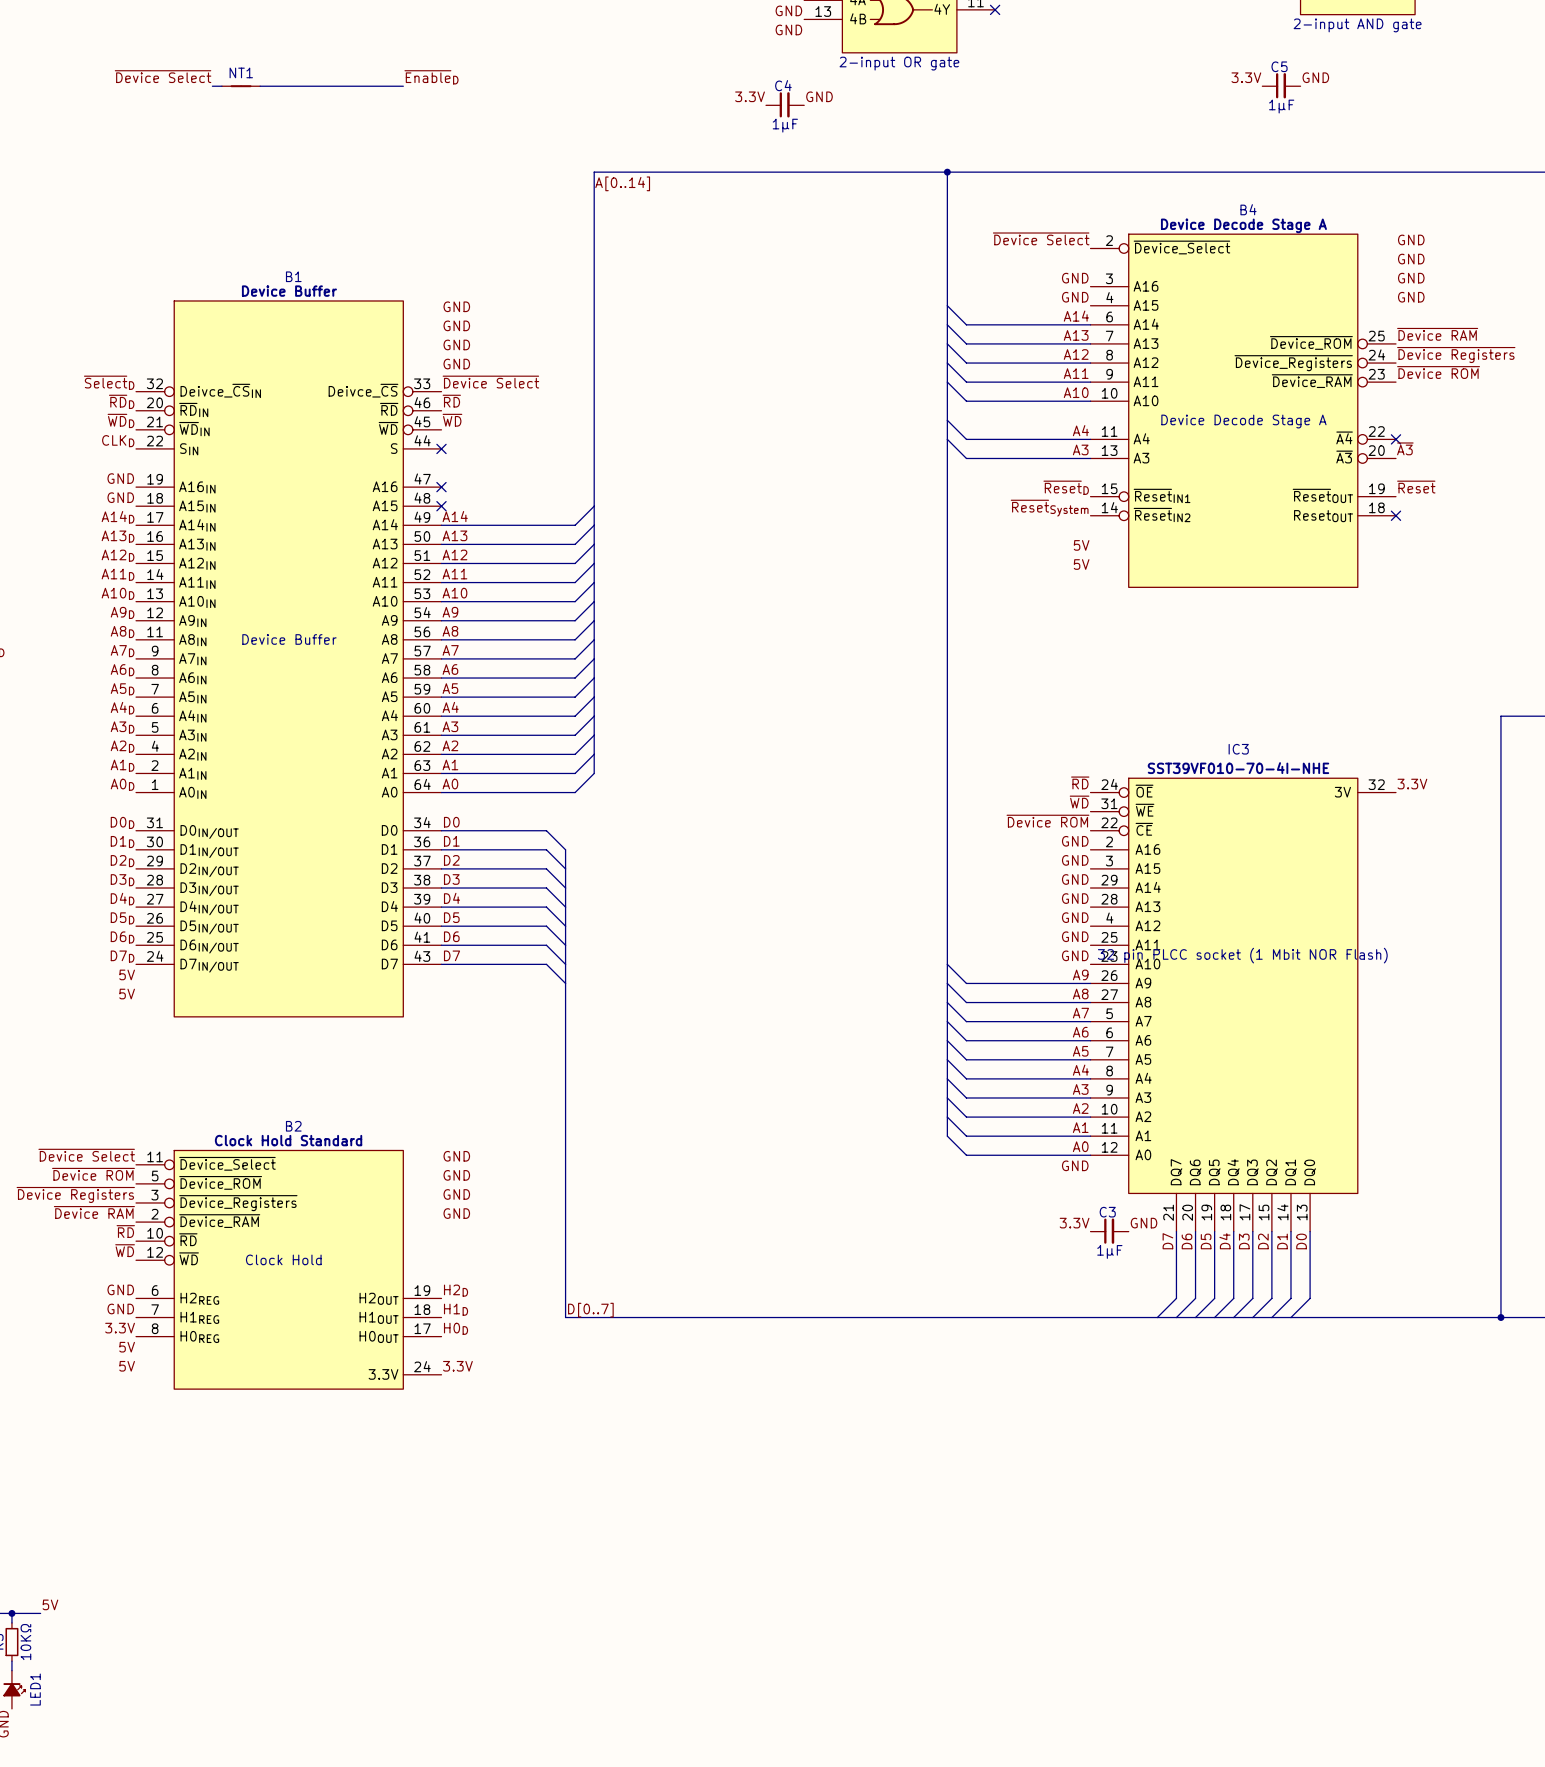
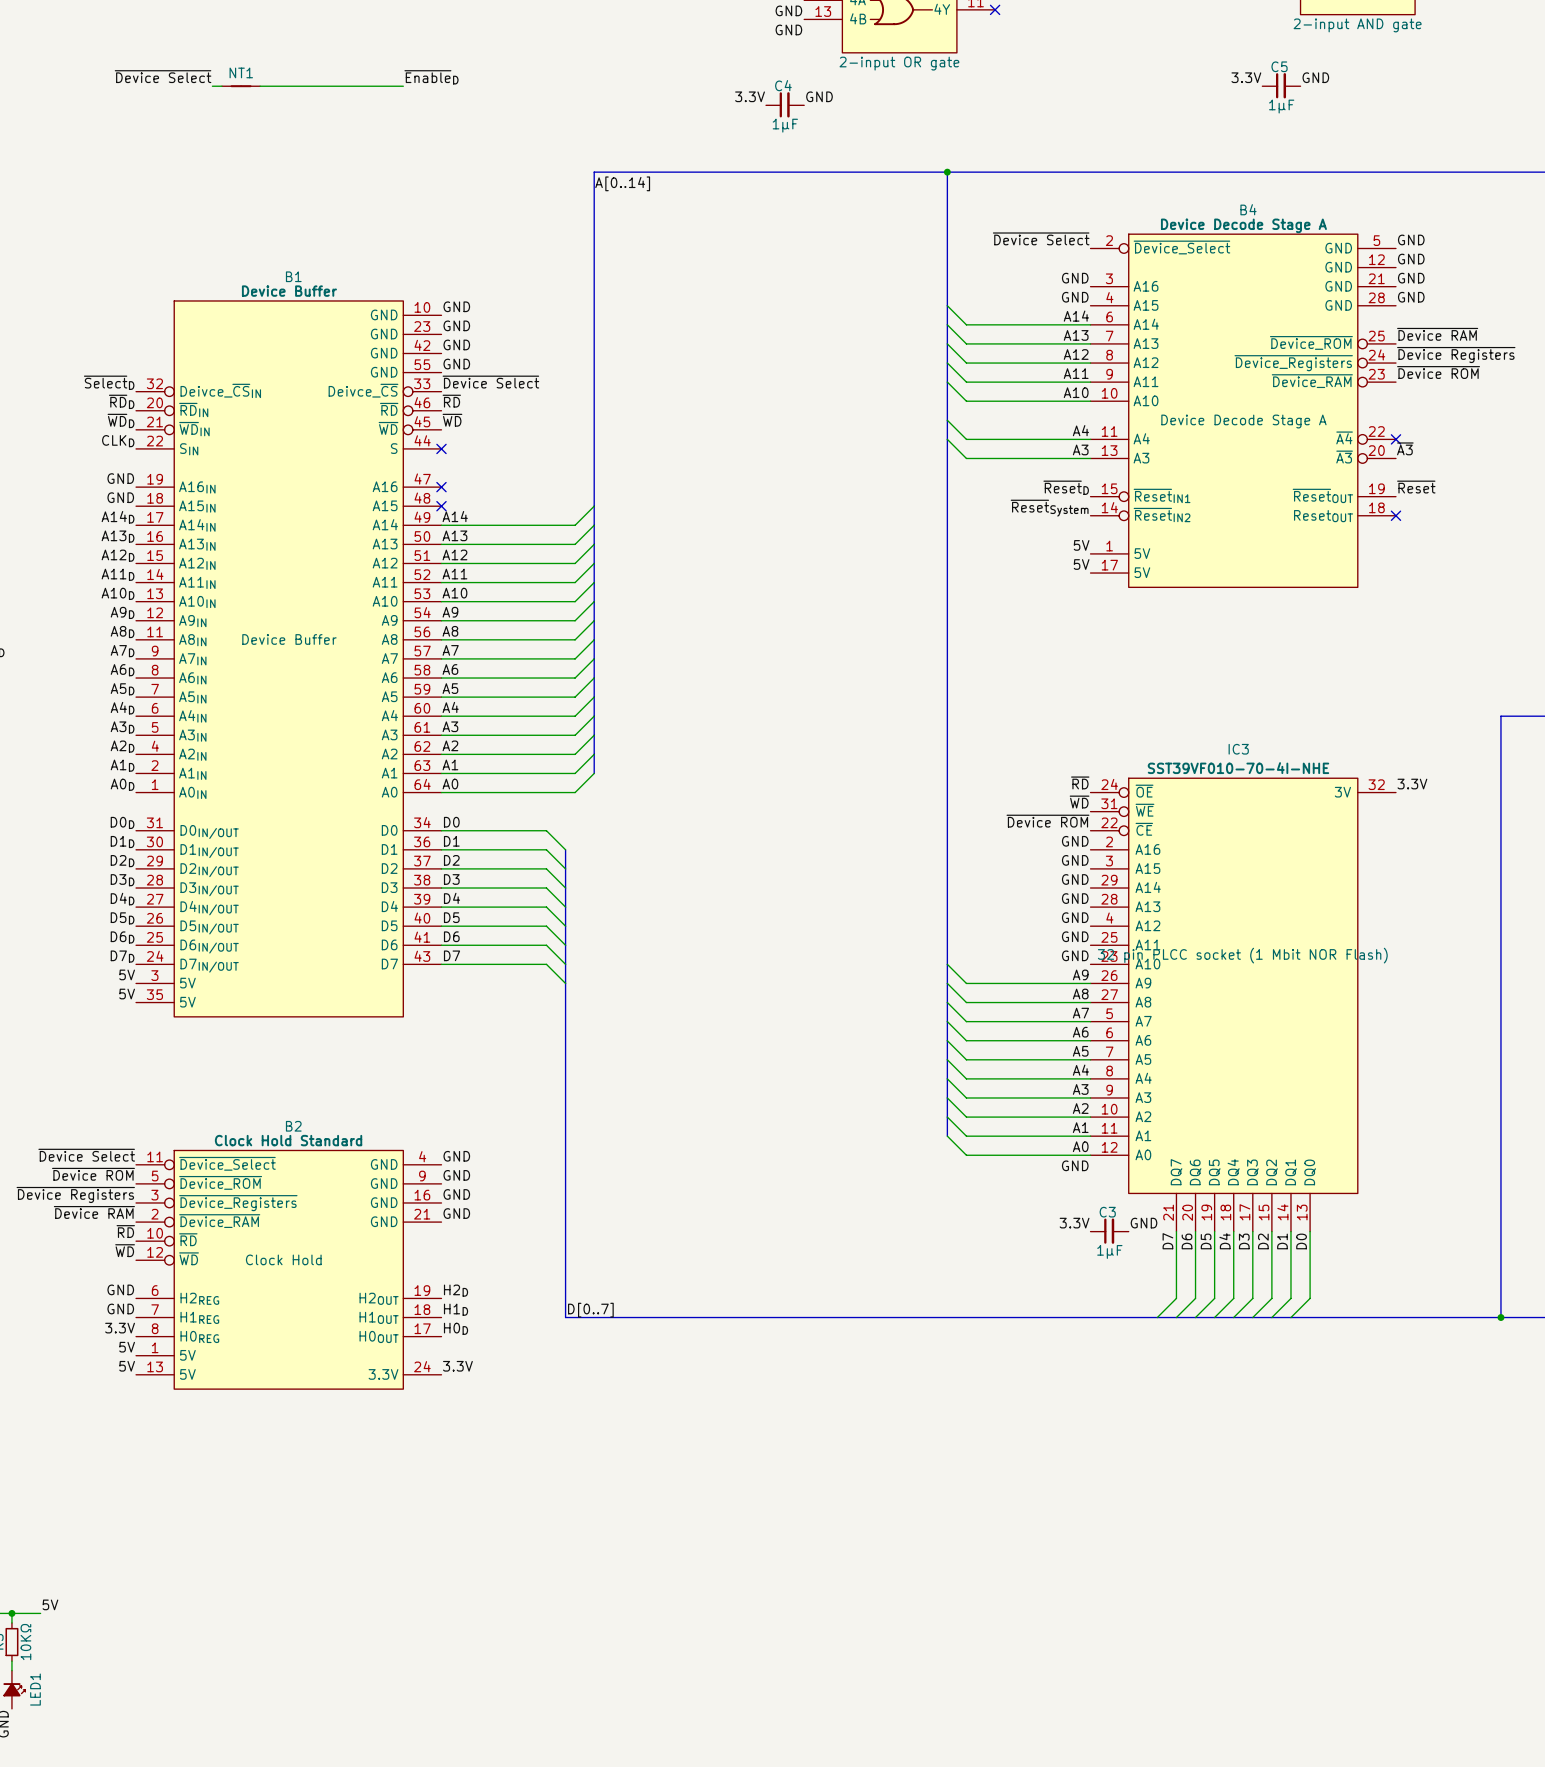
B4 symbol: [1090, 233, 1396, 588] -> [1090, 233, 1396, 588]
B1 symbol: [136, 300, 442, 1018] -> [136, 300, 442, 1018]
B2 symbol: [136, 1149, 442, 1390] -> [136, 1149, 442, 1390]

